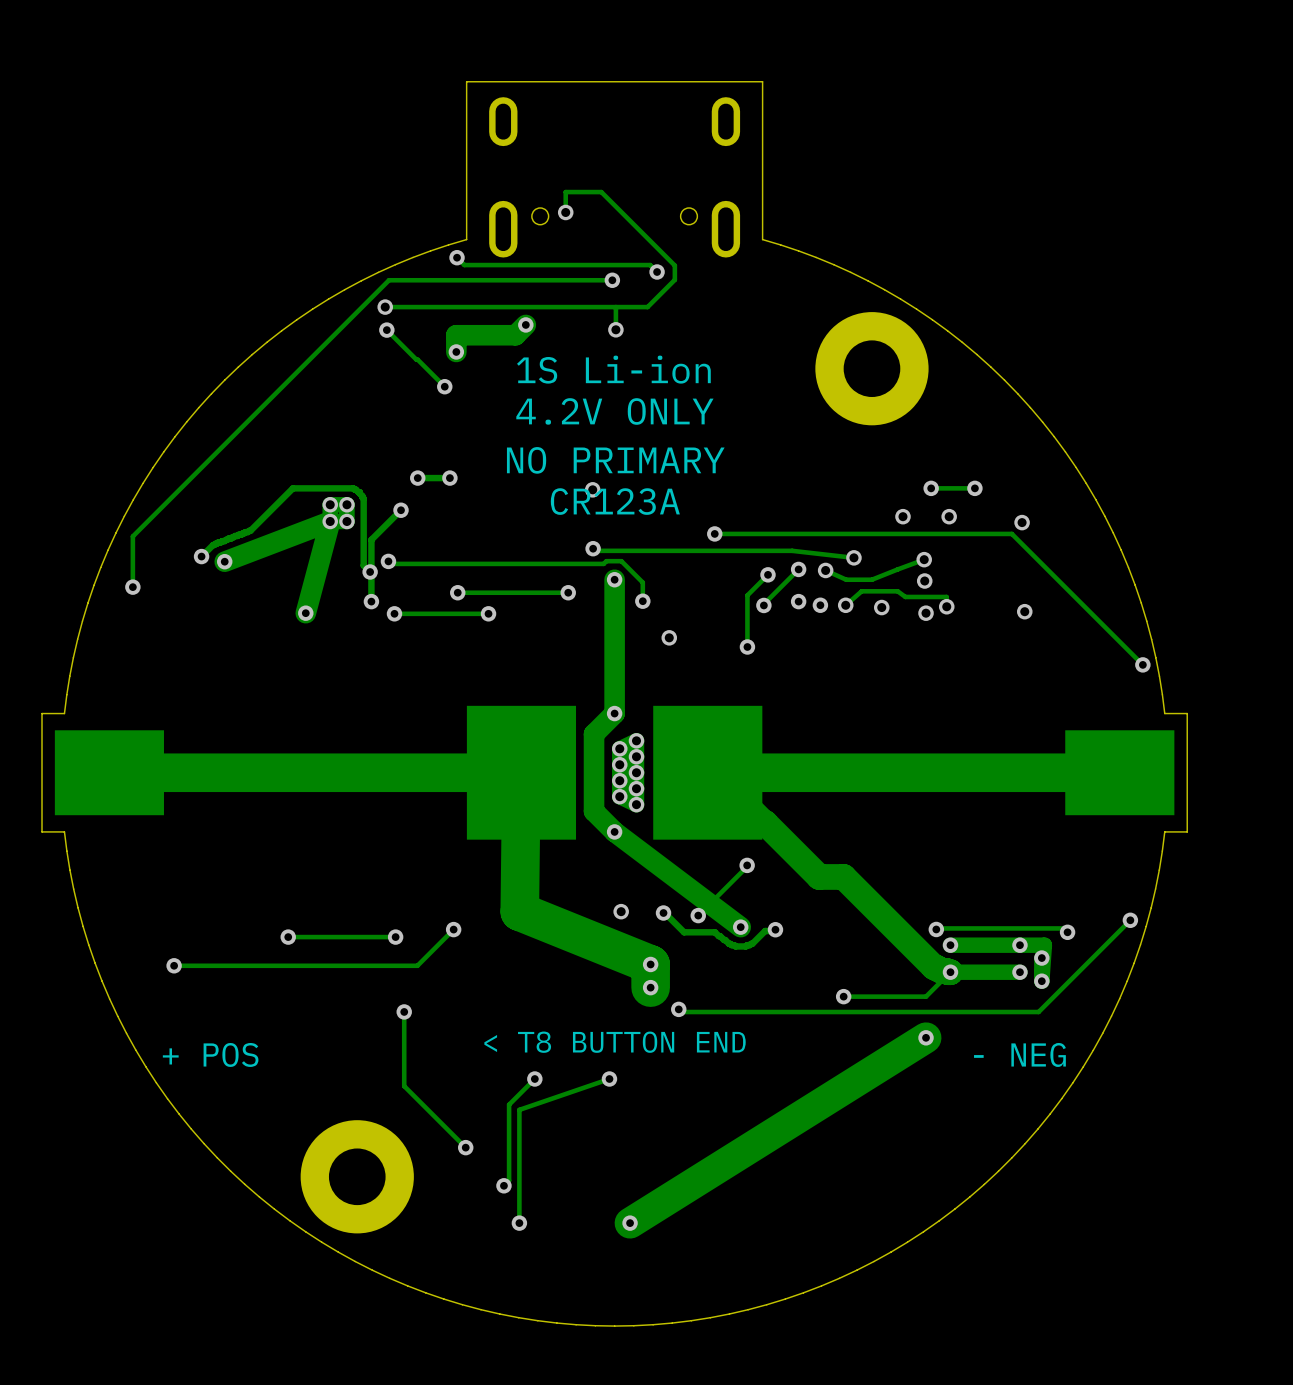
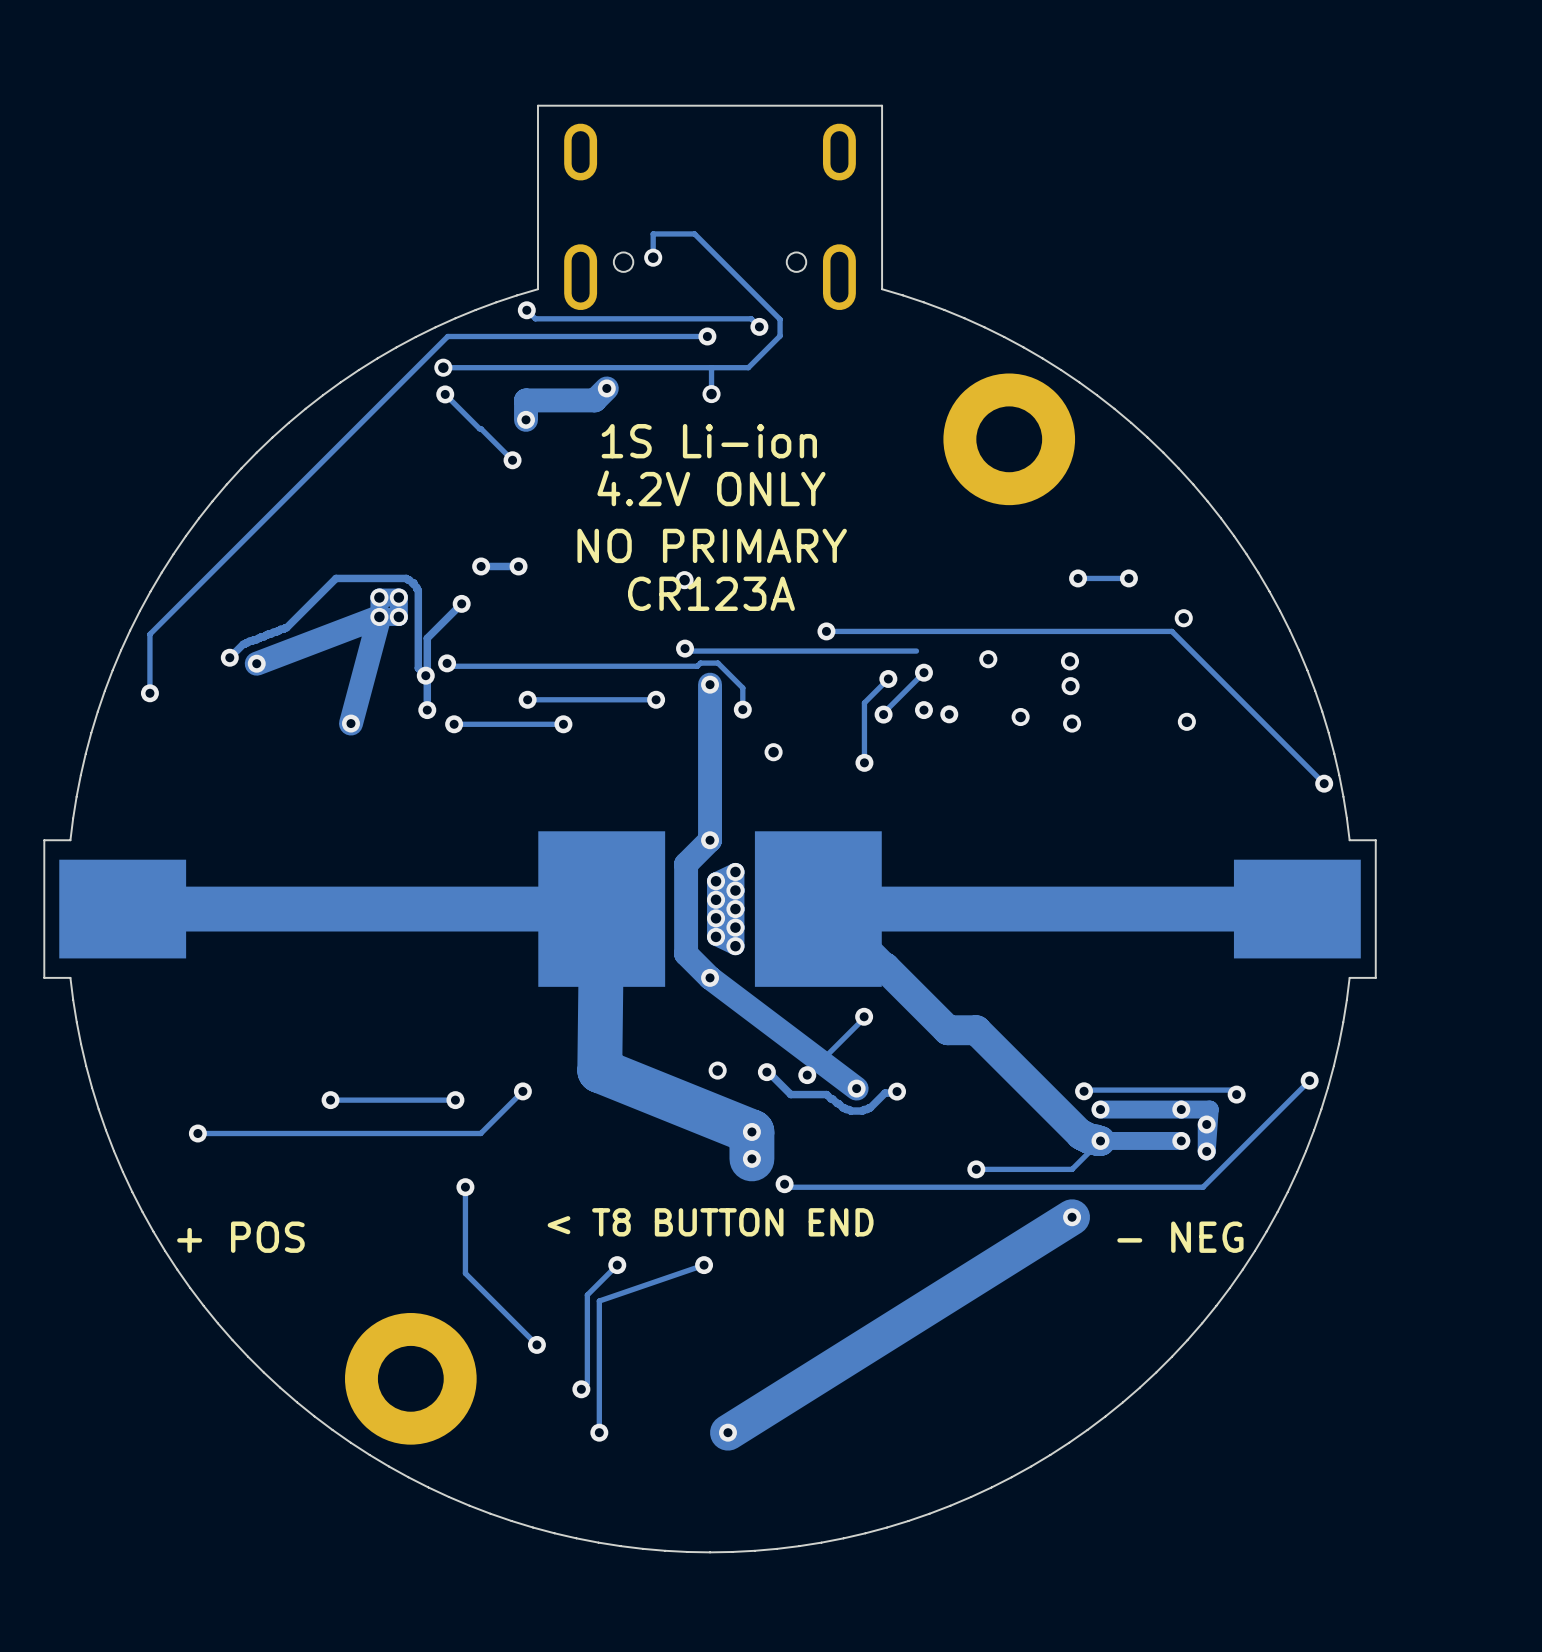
via: (902, 516) -> none
via: (949, 516) -> none
track: (792, 550) (853, 557) -> none
track: (924, 559) (871, 579) (846, 579) (825, 570) -> none
via: (825, 570) -> none
track: (845, 605) (861, 591) (897, 591) (905, 596) (946, 596) (946, 606) -> none
via: (845, 605) -> none
via: (946, 606) -> none

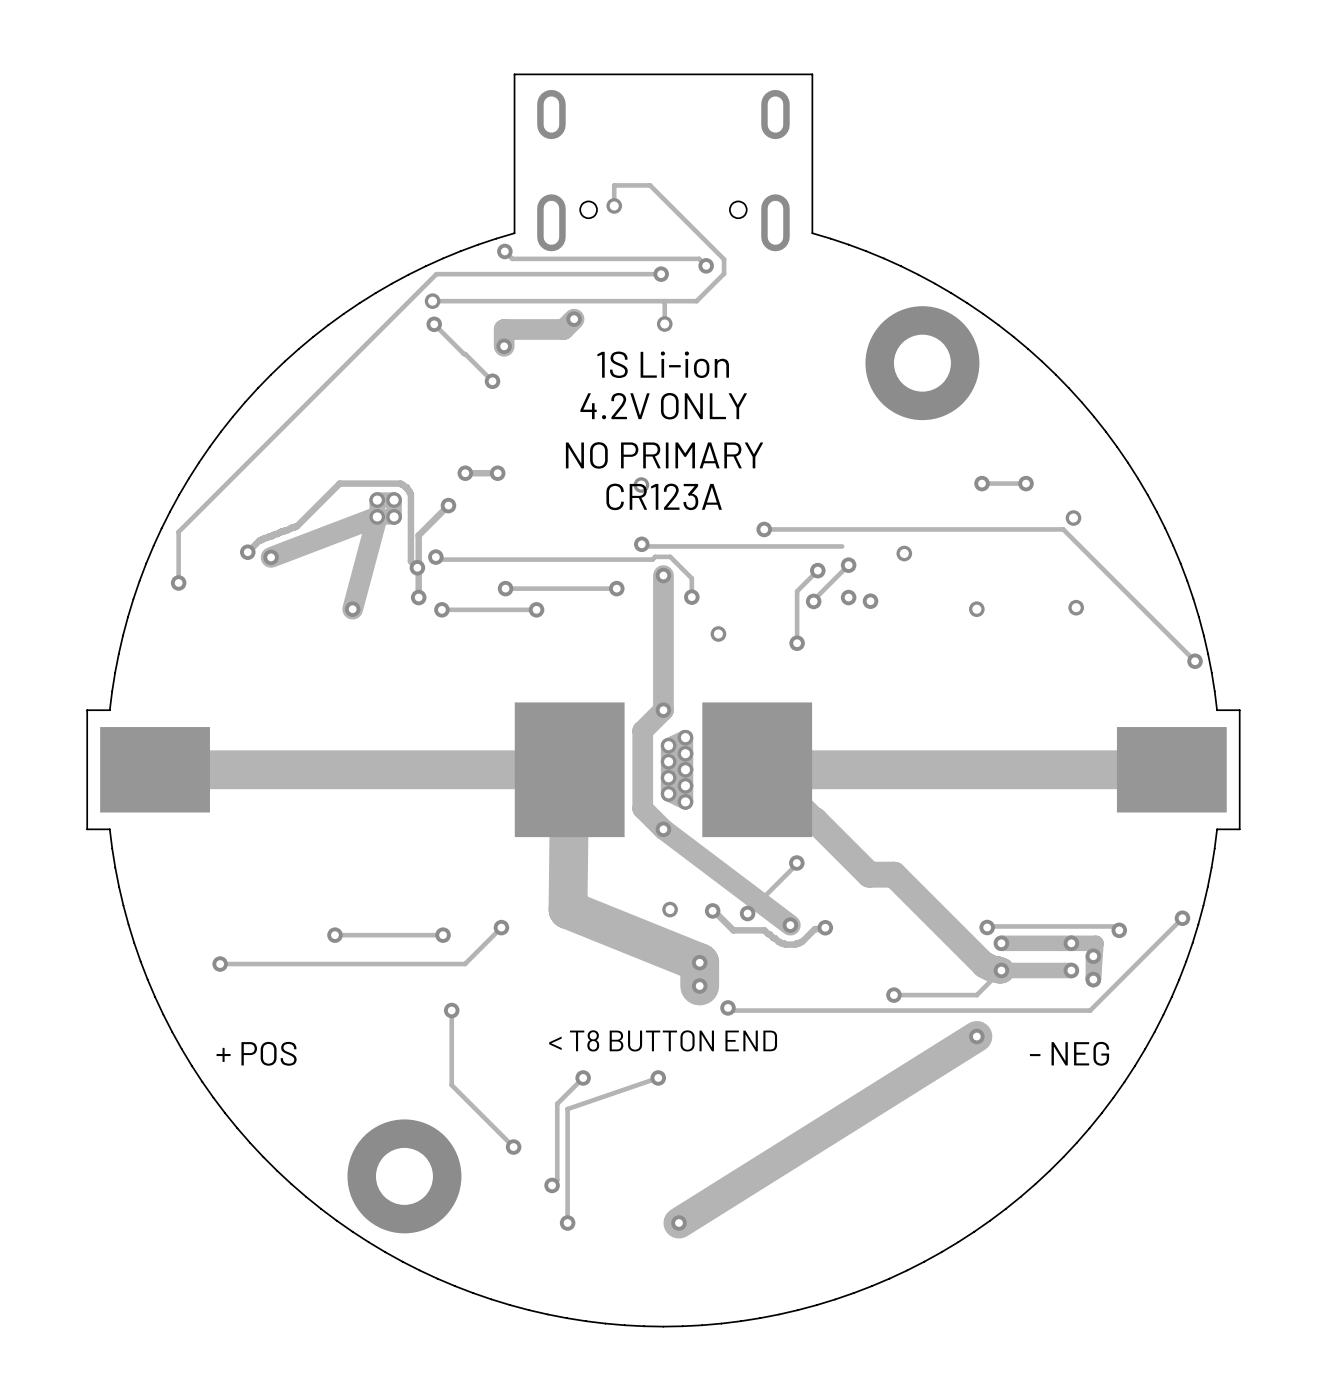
via: (1069, 661) -> none
via: (1070, 686) -> none
via: (1020, 717) -> none

